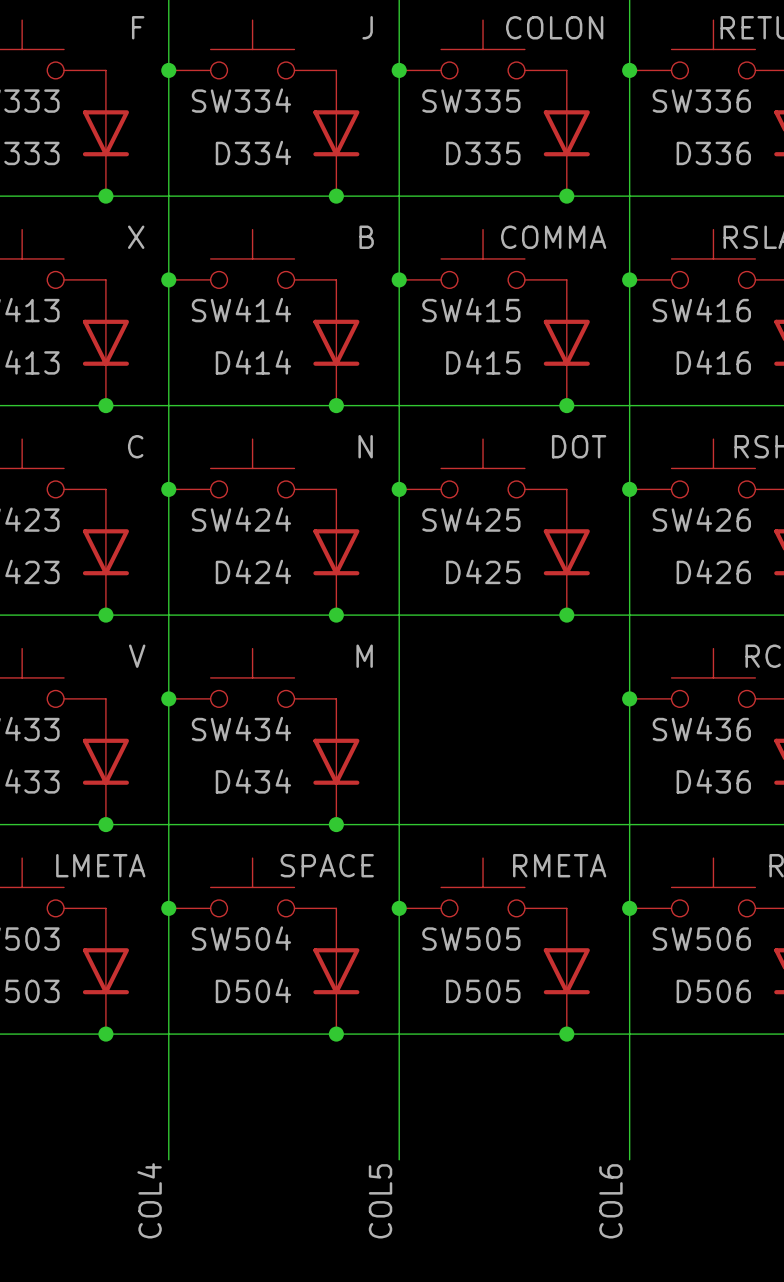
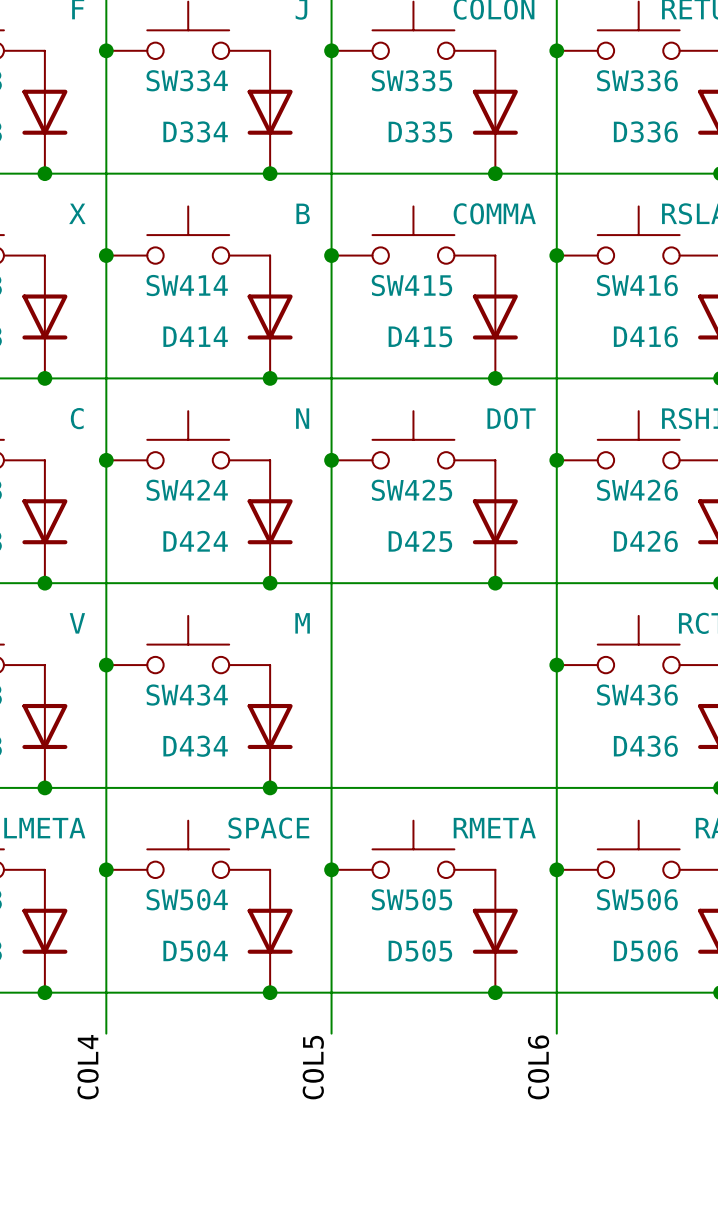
wire: (168, 1075) (168, 1159) -> none
wire: (399, 1075) (399, 1159) -> none
wire: (629, 1075) (629, 1159) -> none
label position: COL4 (149, 1200) -> COL4 (88, 1067)
label position: COL5 (380, 1201) -> COL5 (313, 1067)
label position: COL6 (610, 1201) -> COL6 (538, 1067)

